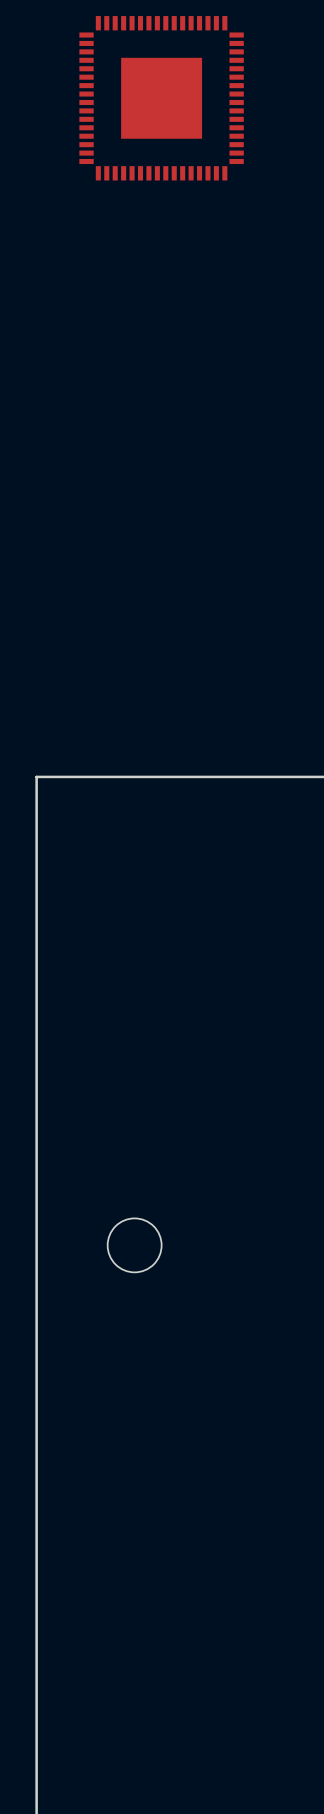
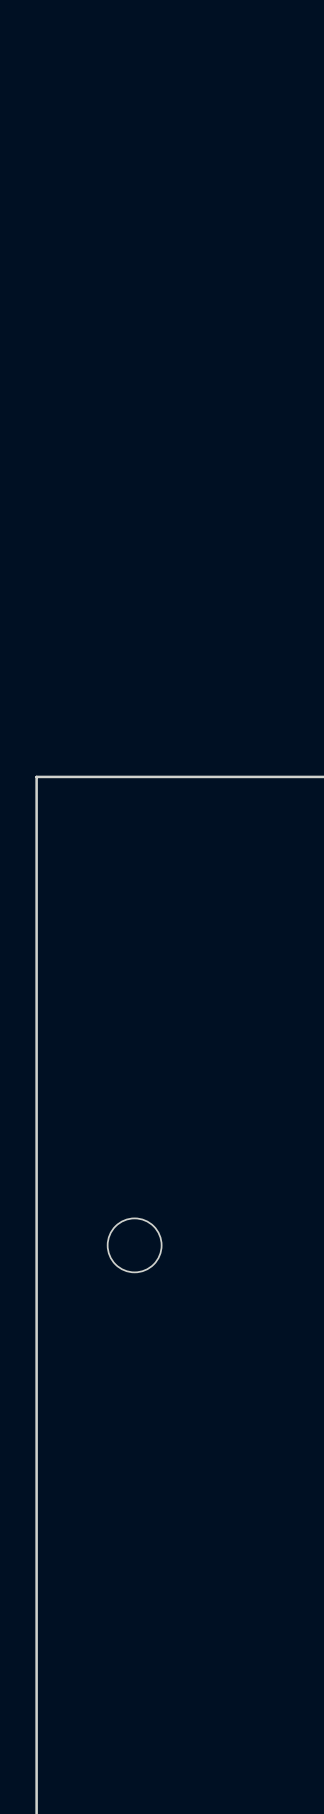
part: (161, 98) -> none

